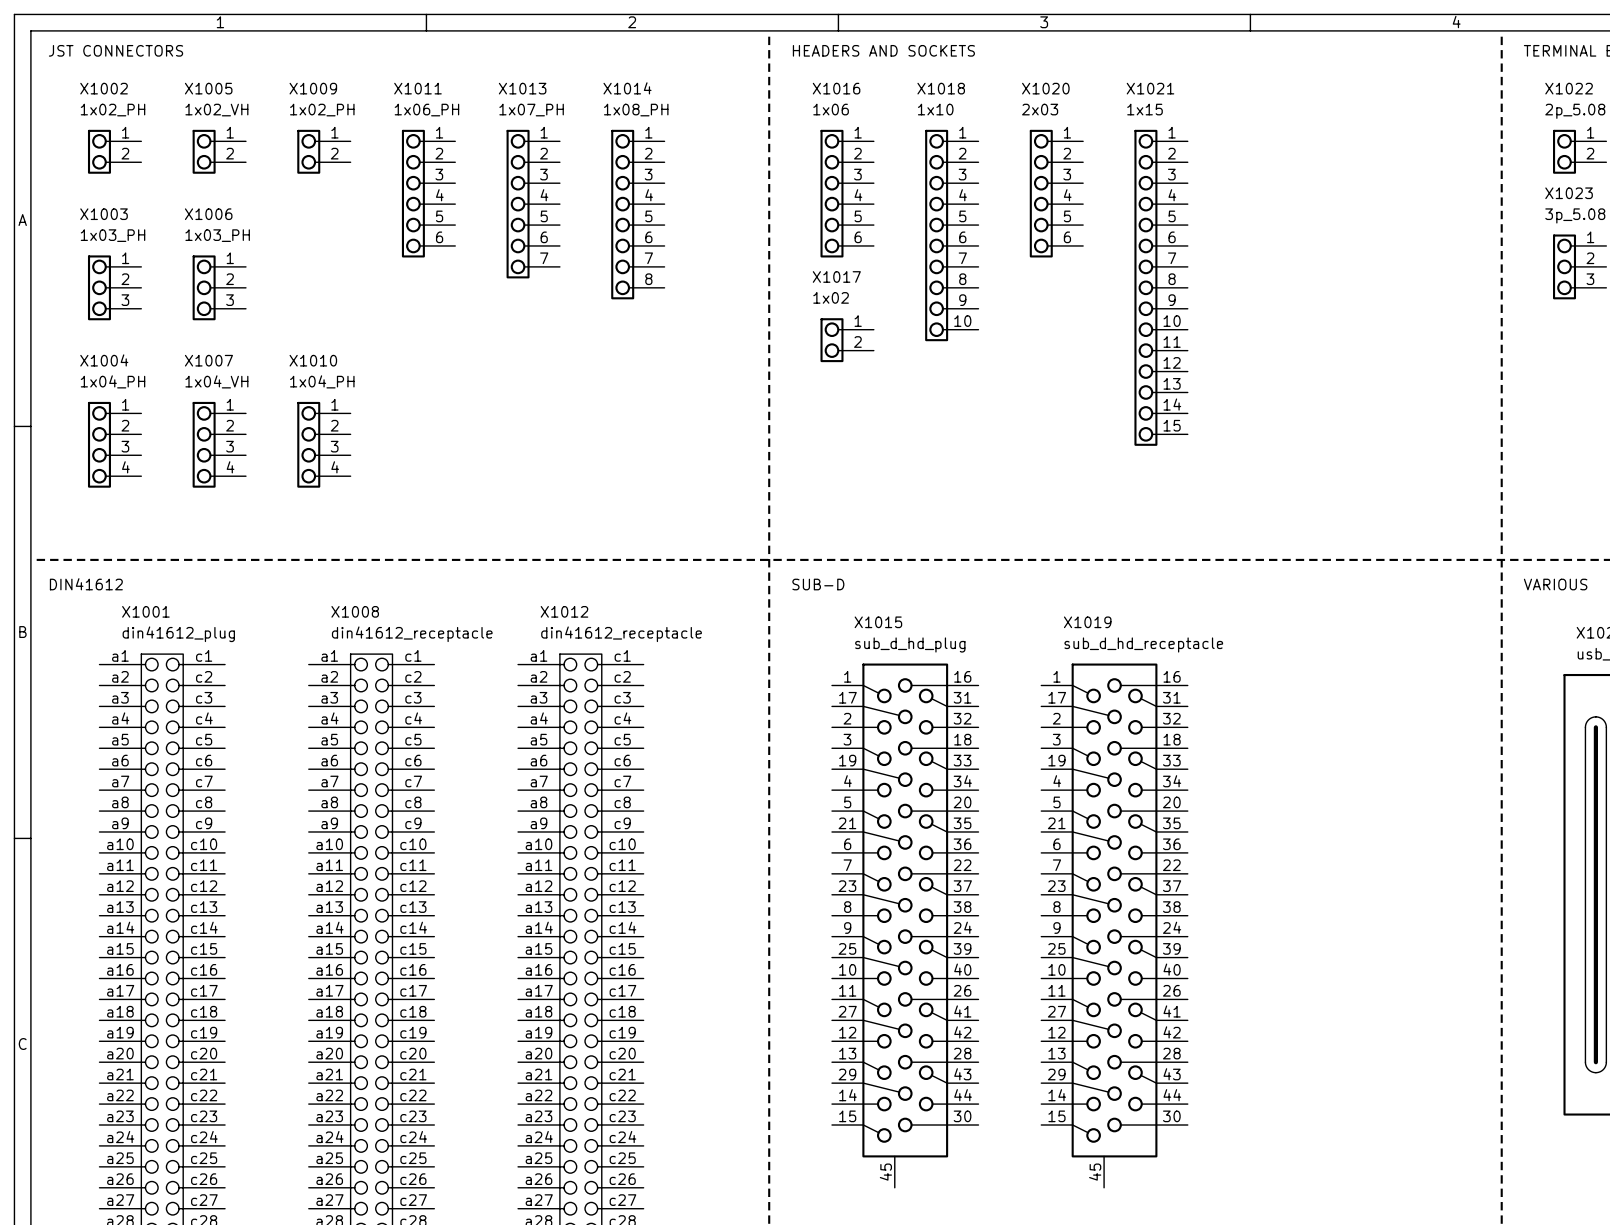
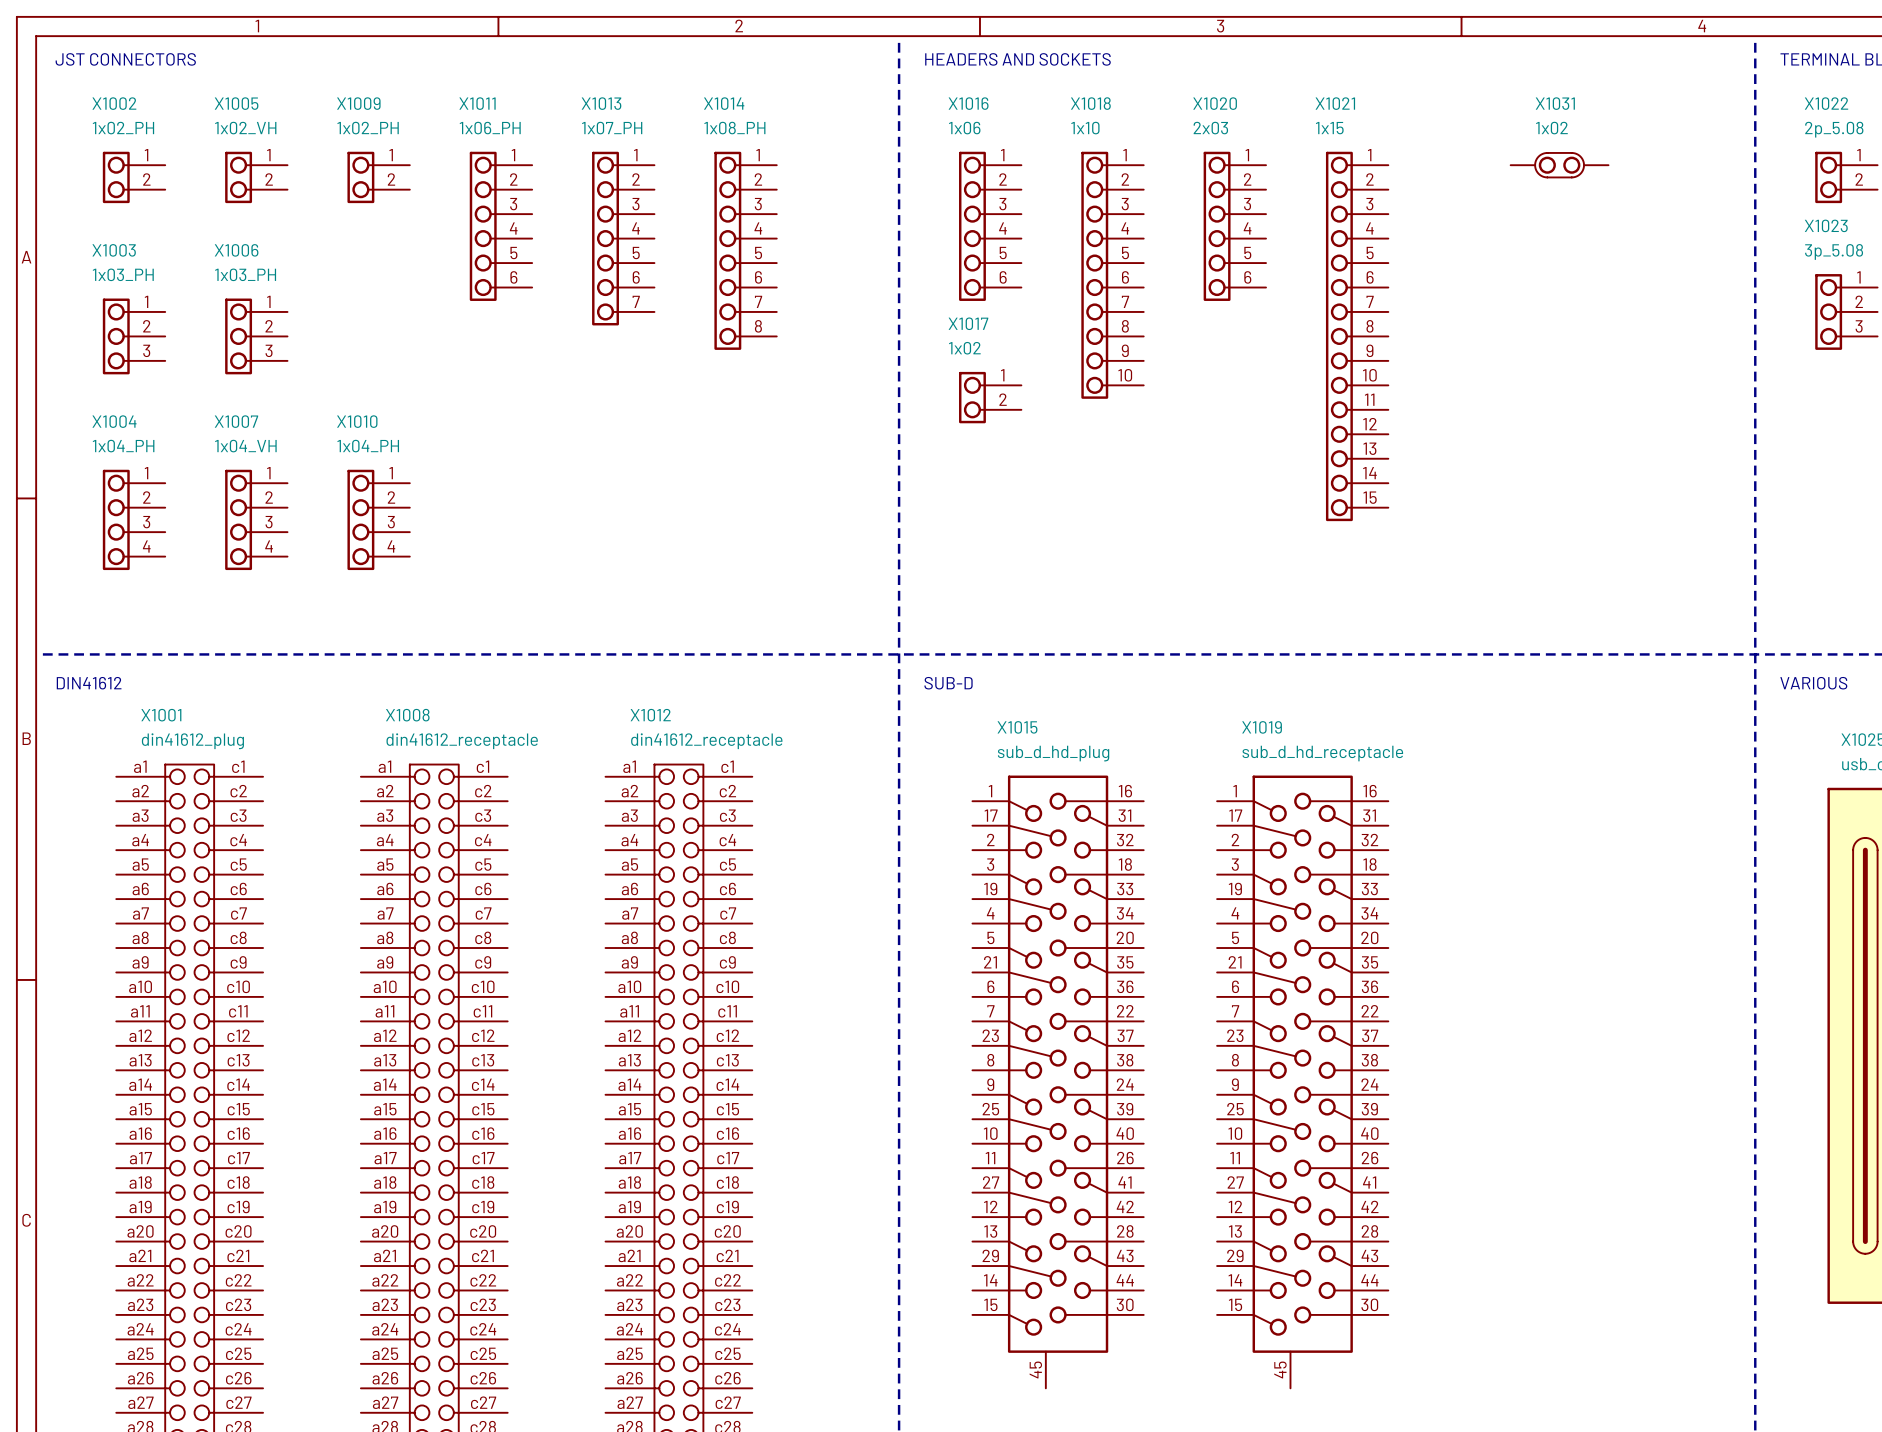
X1031: none -> 1x02 (1559, 165)

